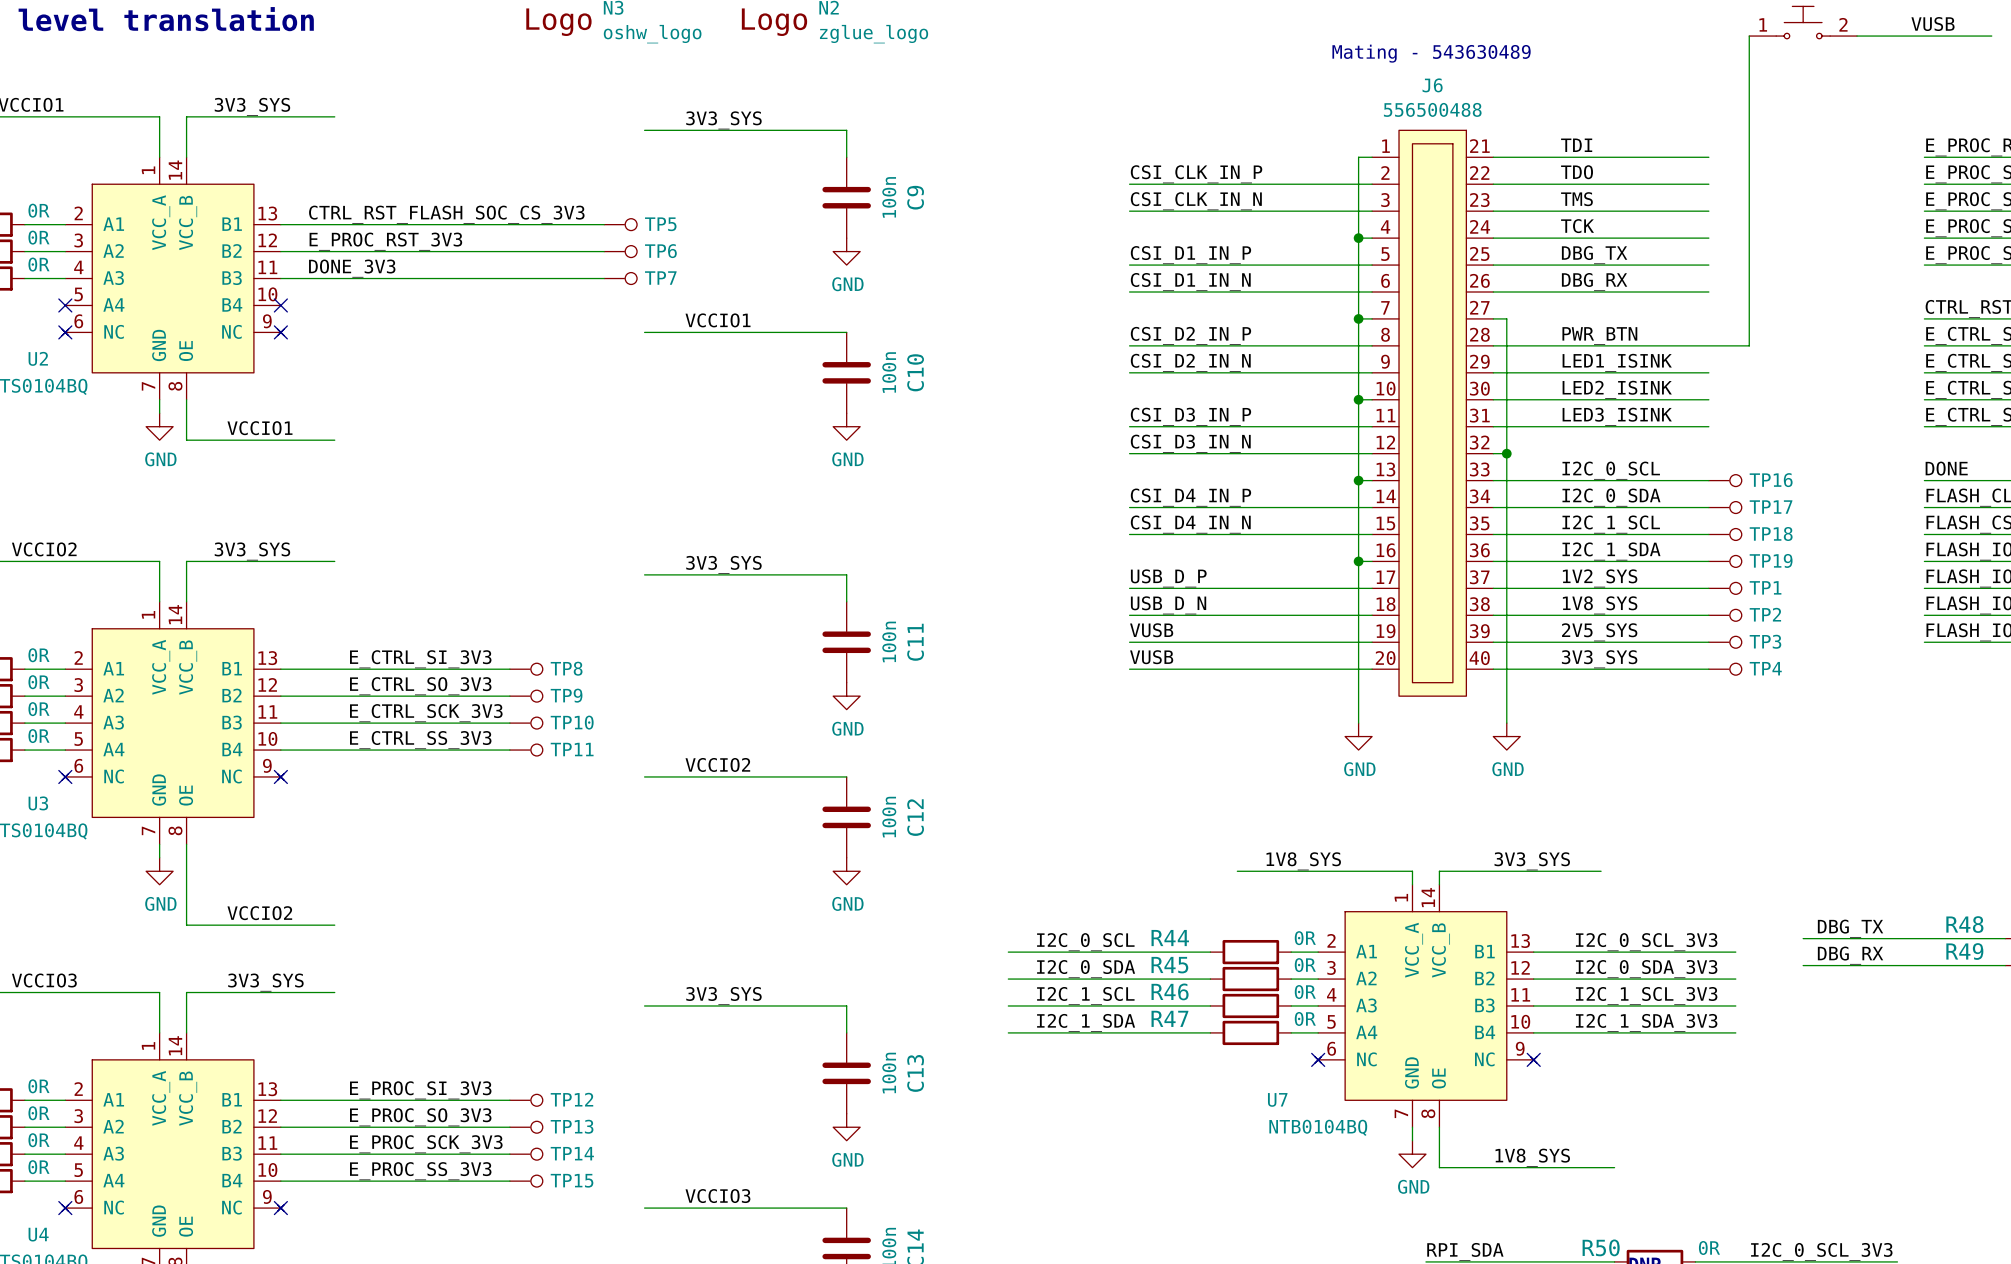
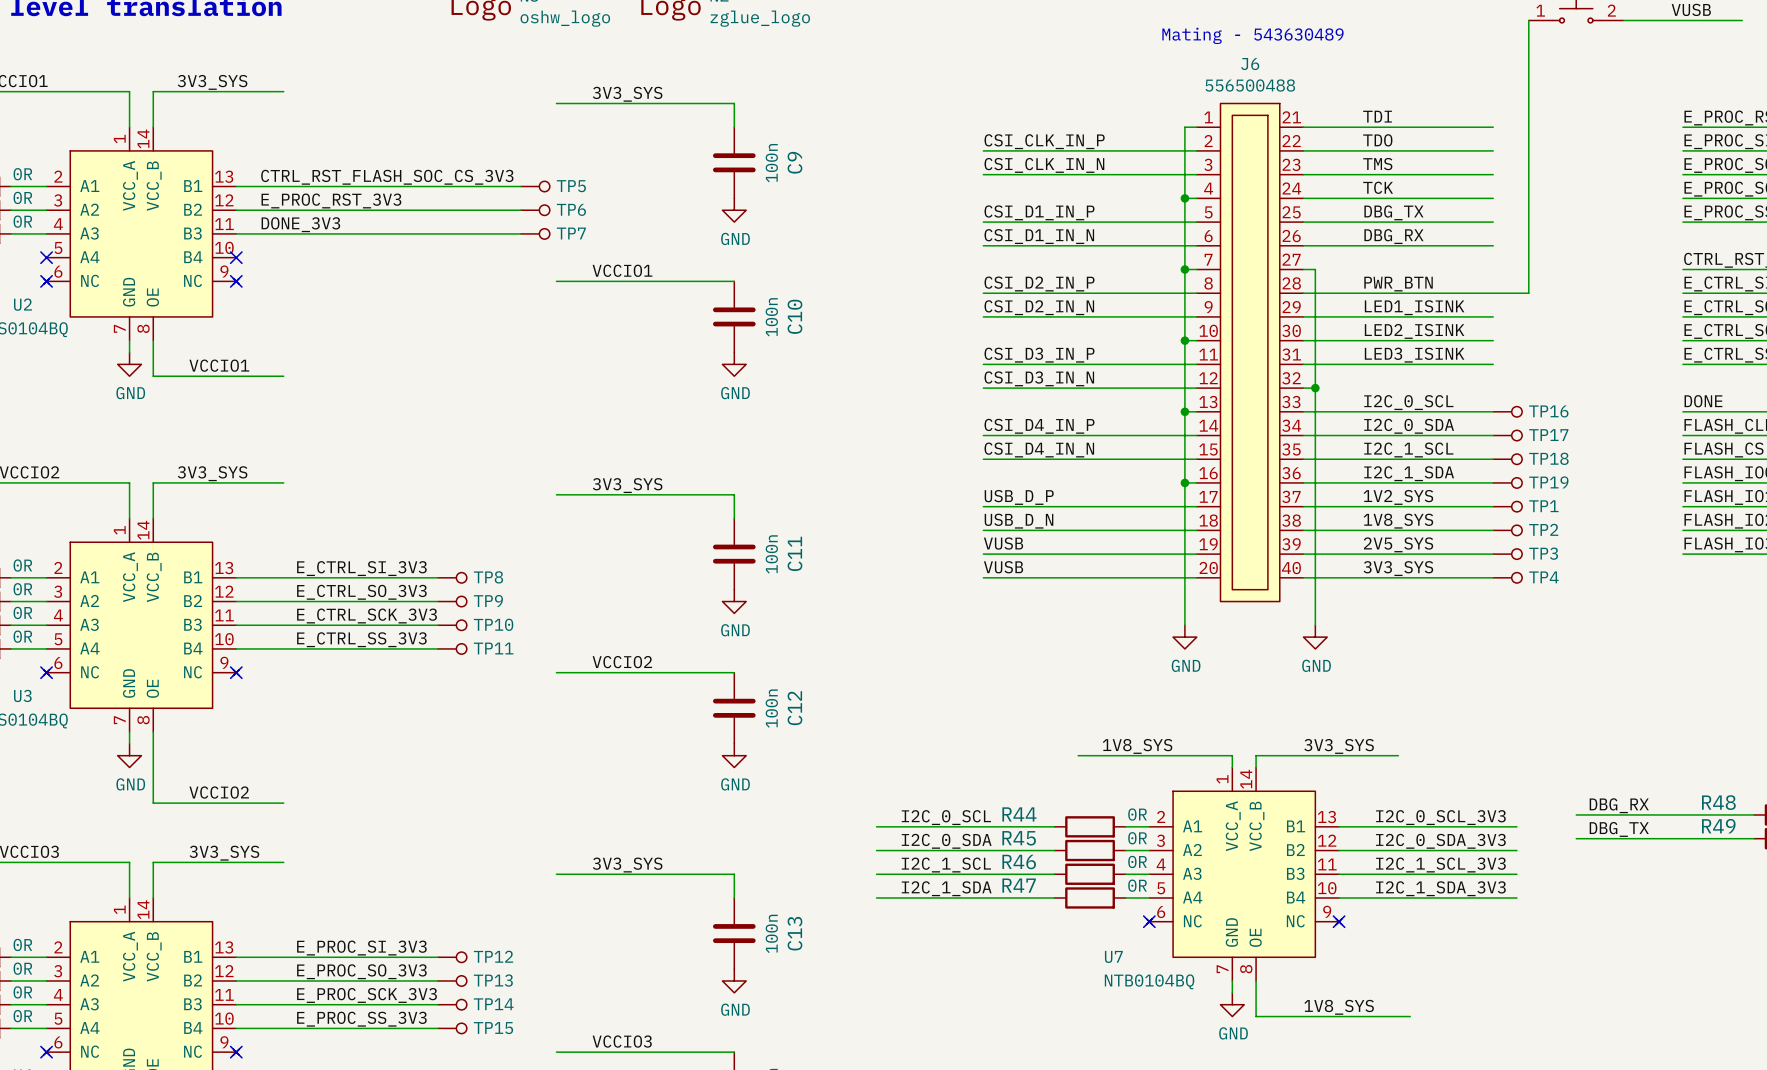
label: DBG_TX (1850, 928) -> DBG_RX (1619, 805)
label: DBG_RX (1850, 955) -> DBG_TX (1619, 829)

